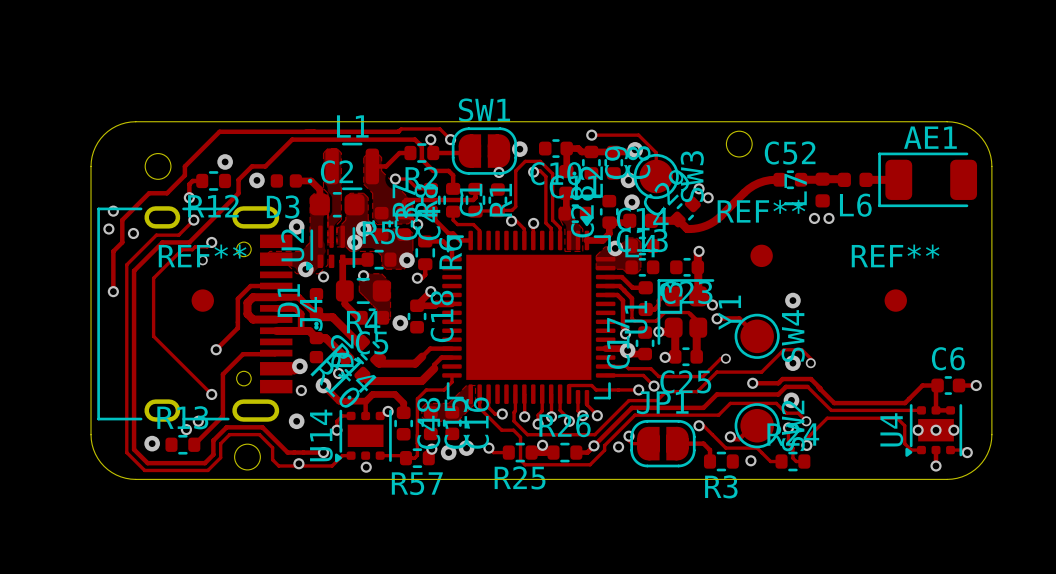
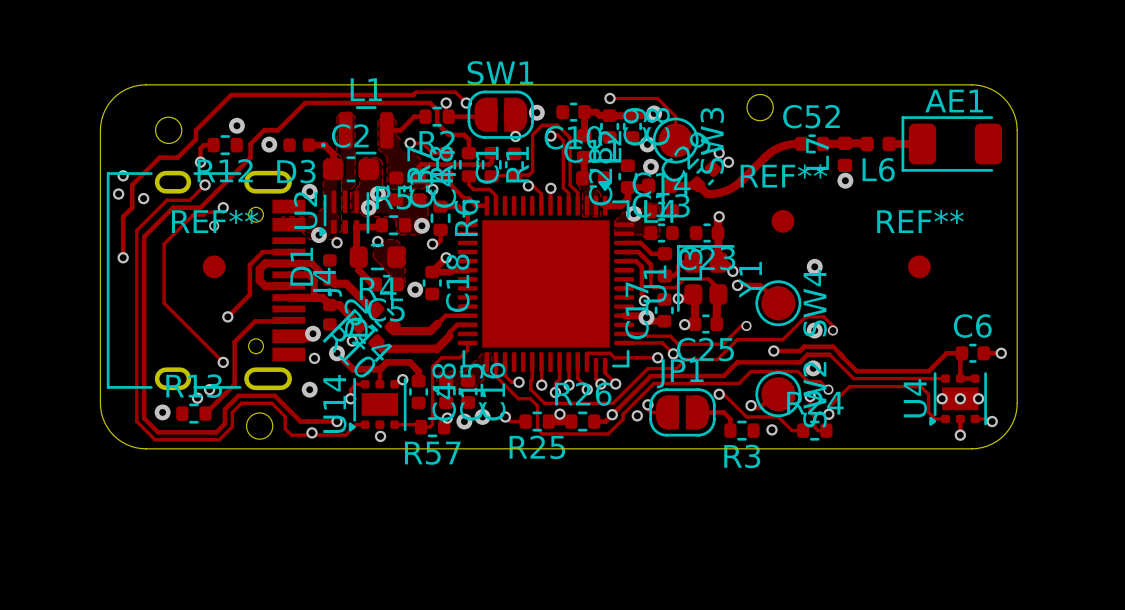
via: none -> (845, 180)
via: (814, 218) -> none
via: (828, 218) -> none

